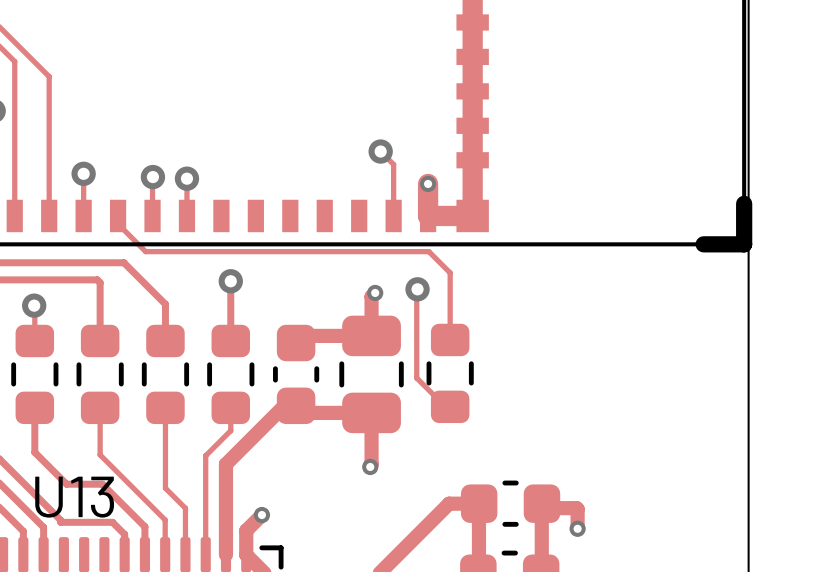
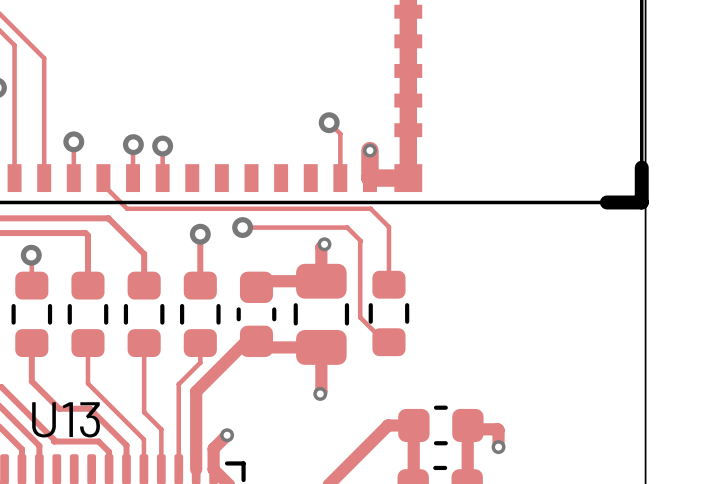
track: none -> (242, 227) (347, 227) (360, 241)
via position: (417, 289) -> (242, 227)

